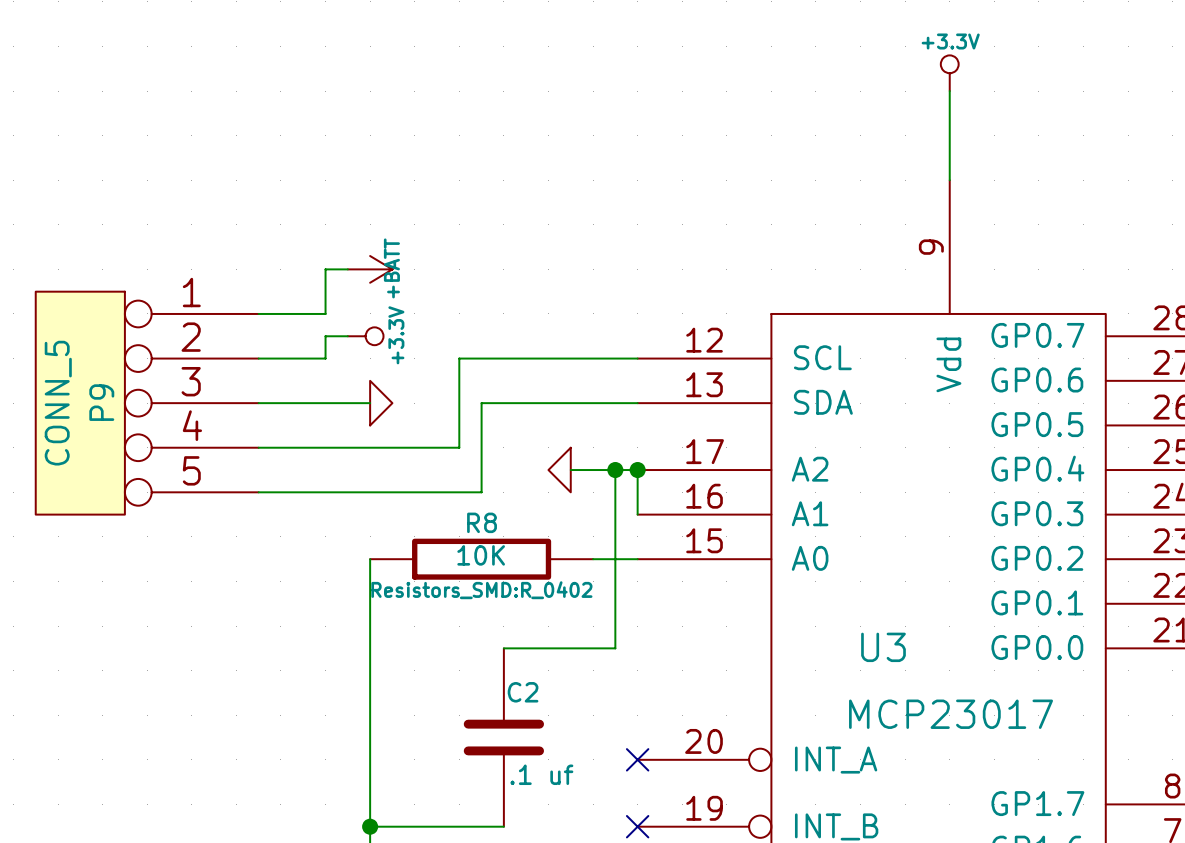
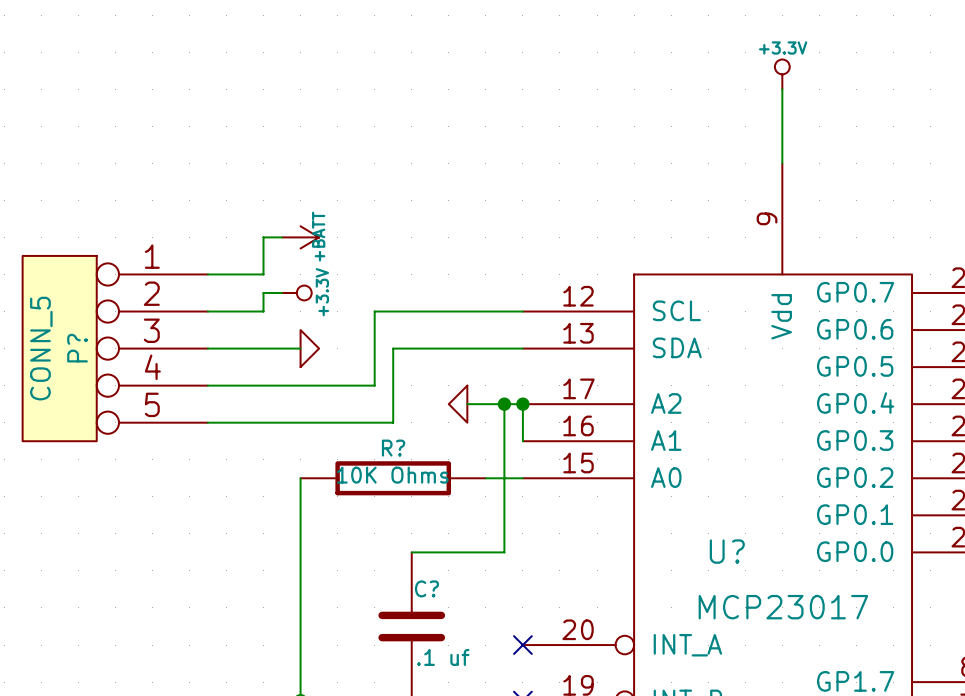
P9 name: P9 (101, 402) -> P? (77, 348)
R8 name: R8 (482, 522) -> R? (393, 448)
R8 value: 10K (481, 555) -> 10K Ohms (392, 475)
R8 text: Resistors_SMD:R_0402 (481, 590) -> none
U3 name: U3 (883, 647) -> U? (727, 551)
C2 name: C2 (523, 692) -> C? (426, 588)

